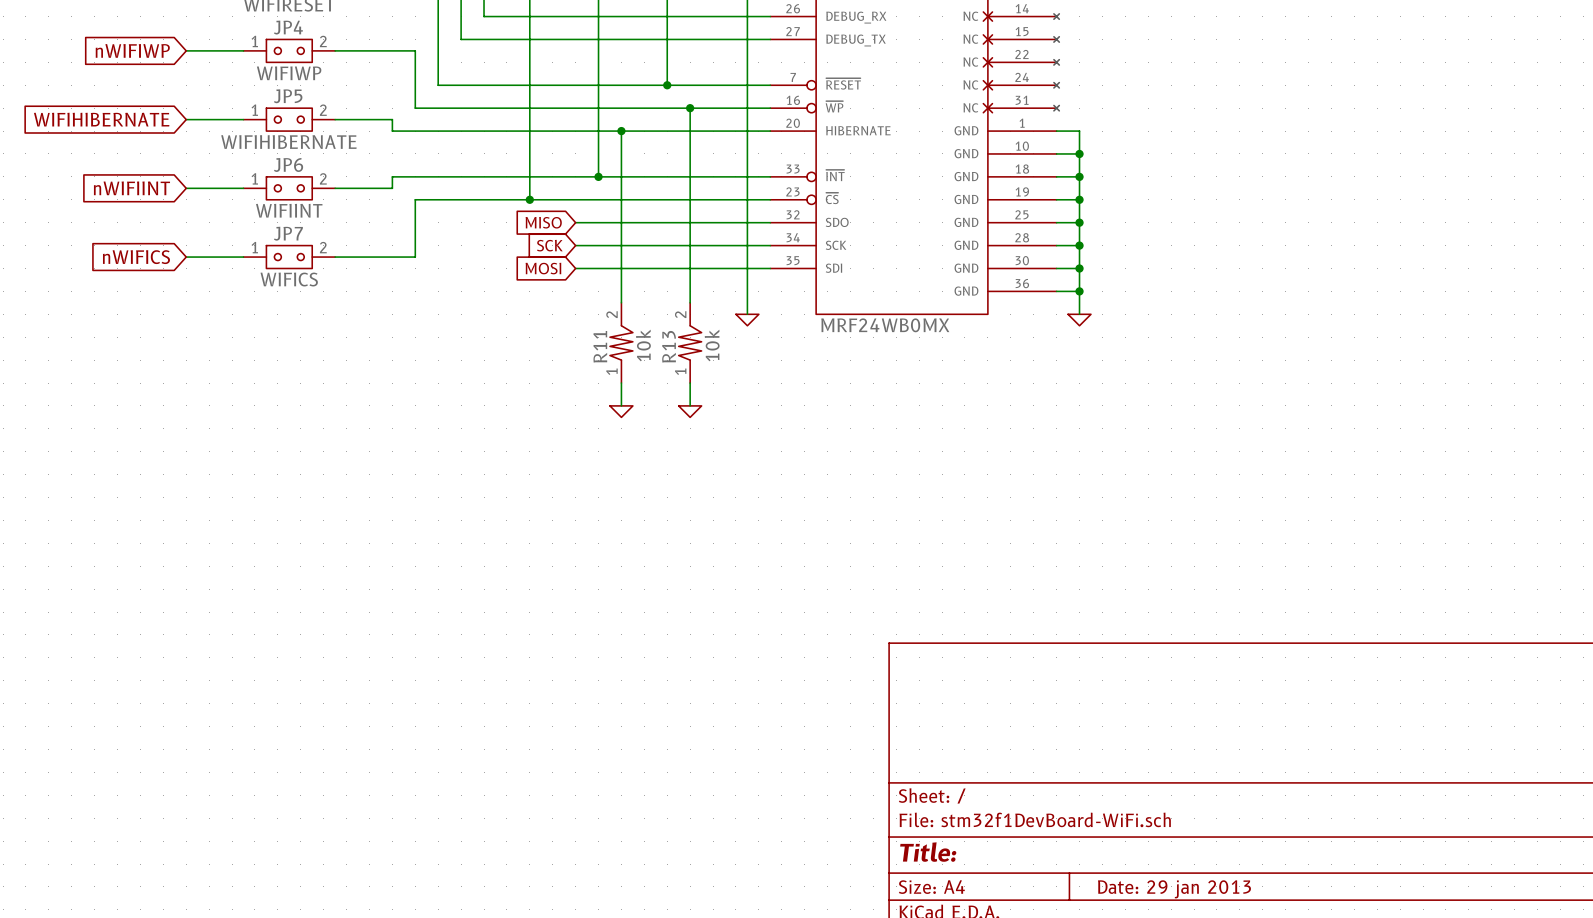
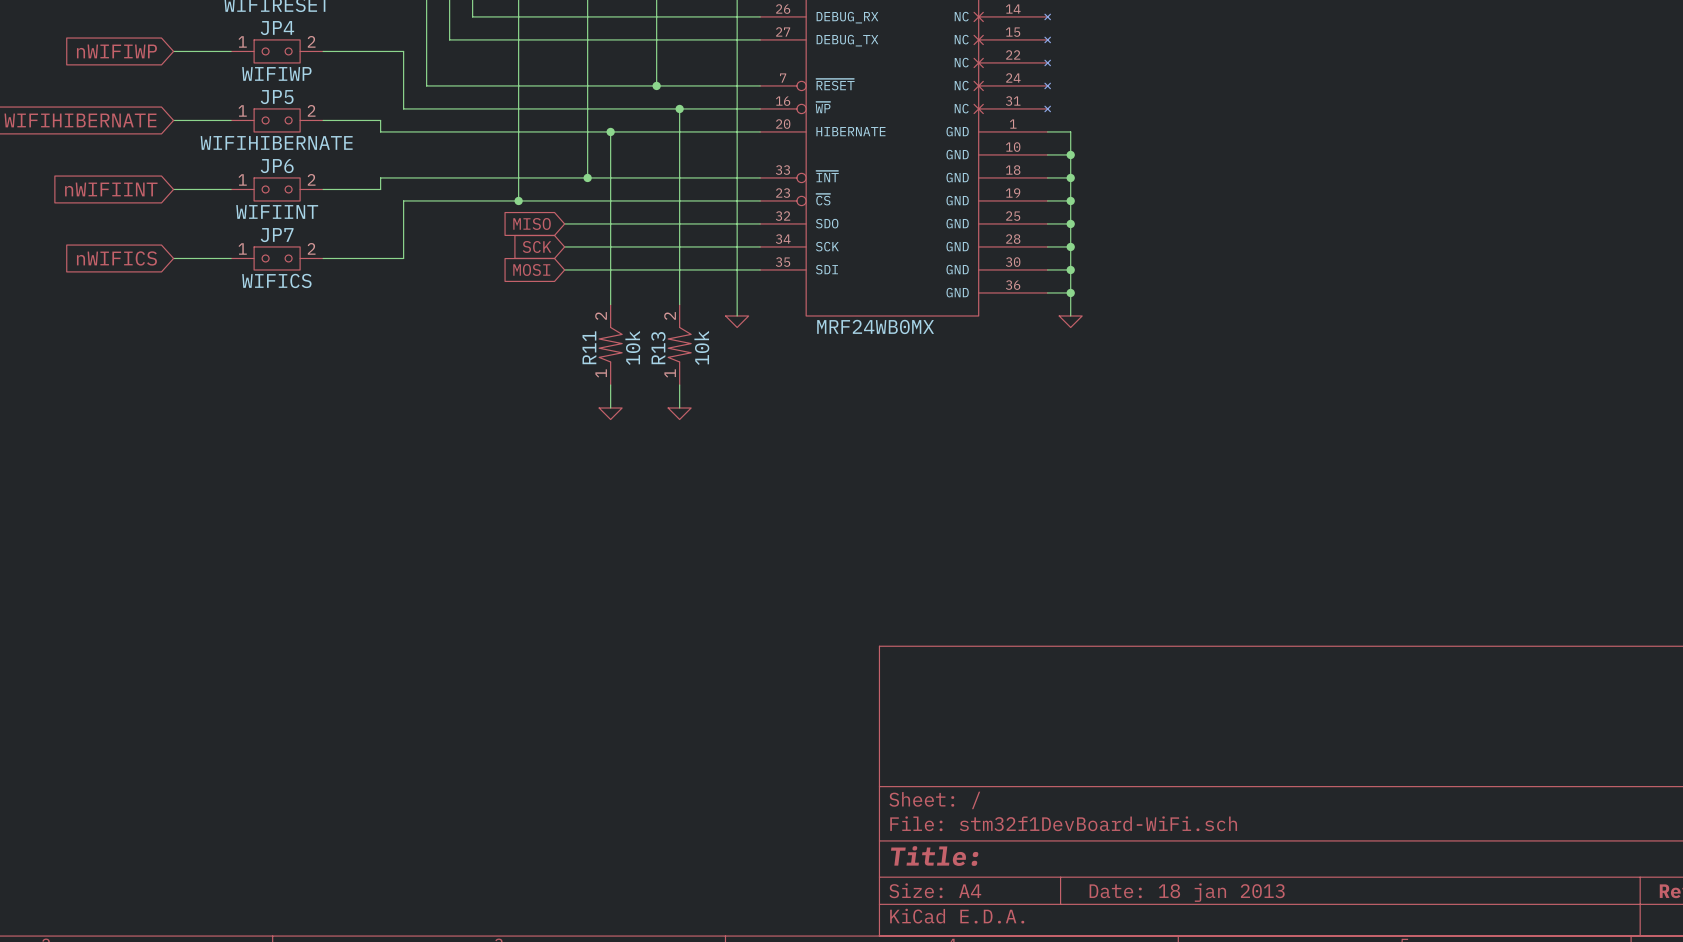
title block: Date: 29 jan 2013 (1174, 889) -> Date: 18 jan 2013 (1187, 892)

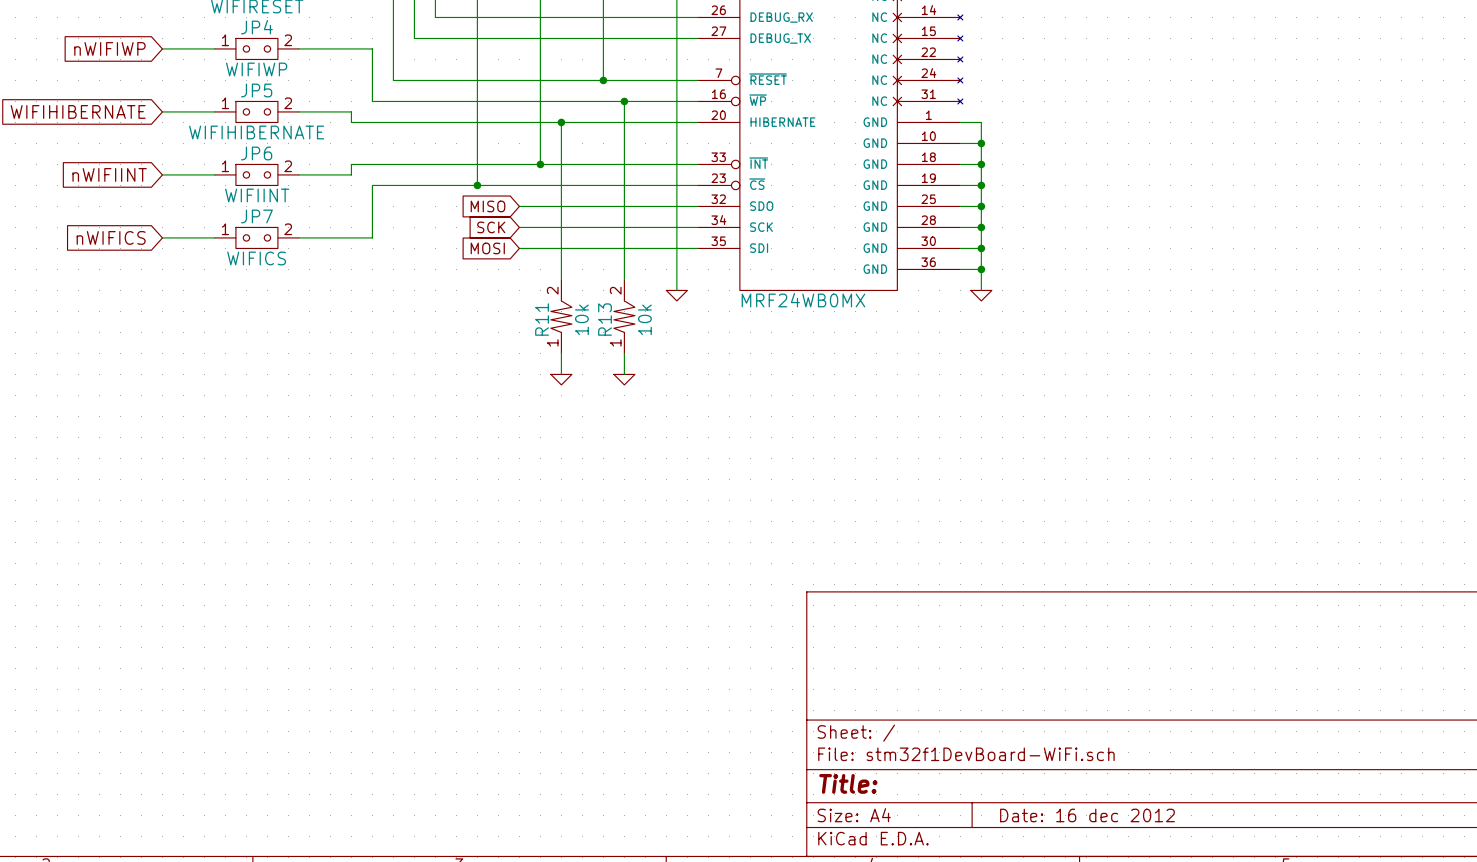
title block: Date: 18 jan 2013 (1187, 892) -> Date: 16 dec 2012 (1087, 815)

